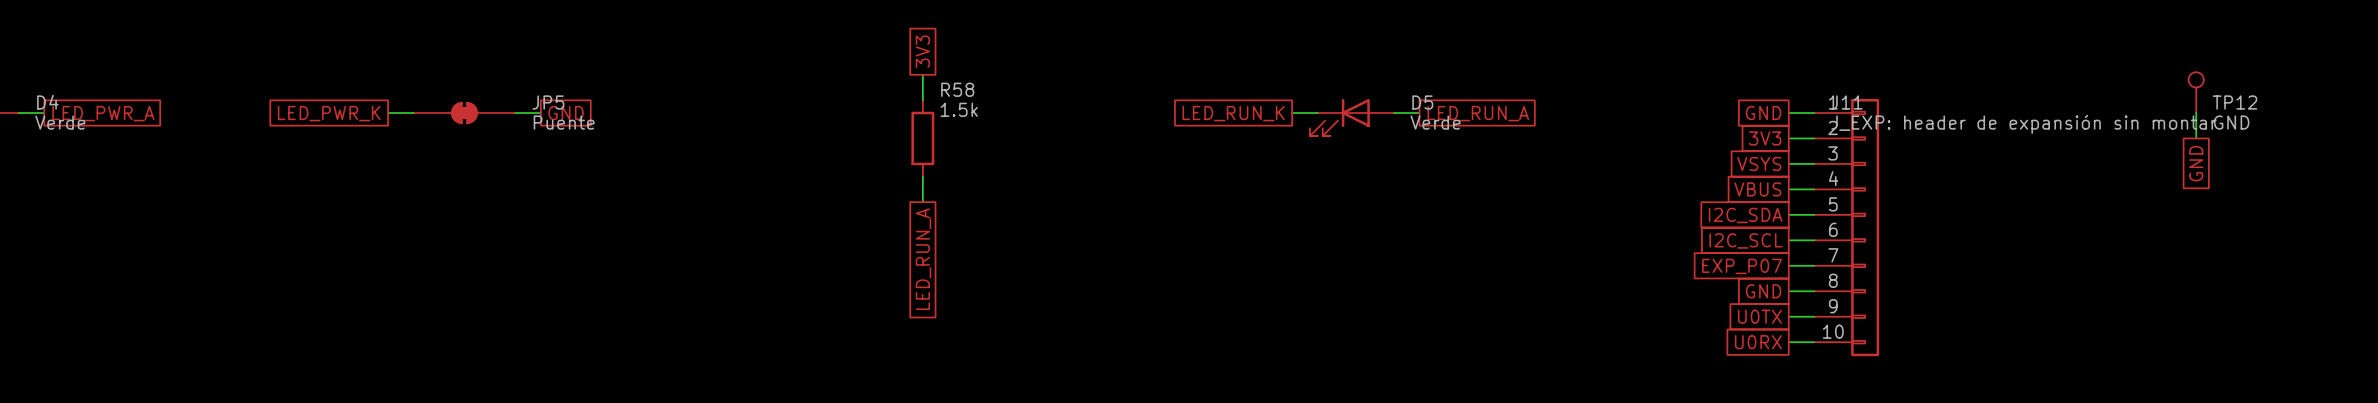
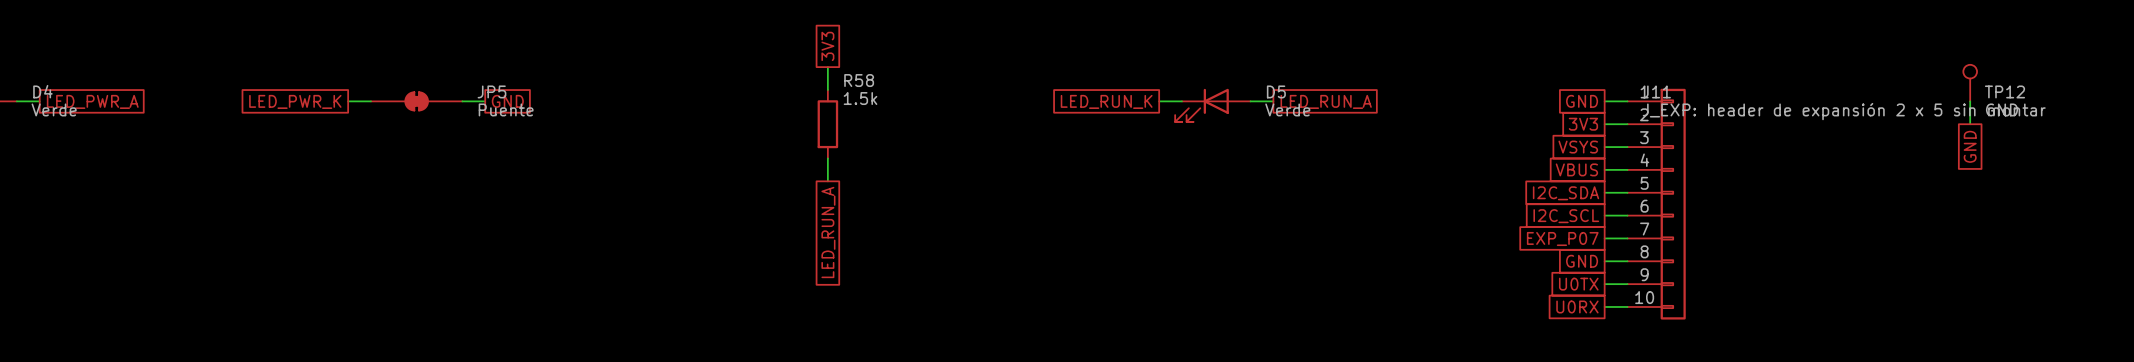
J11 value: J_EXP: header de expansión sin montar (2023, 124) -> J_EXP: header de expansión 2 x 5 sin montar (1844, 111)

